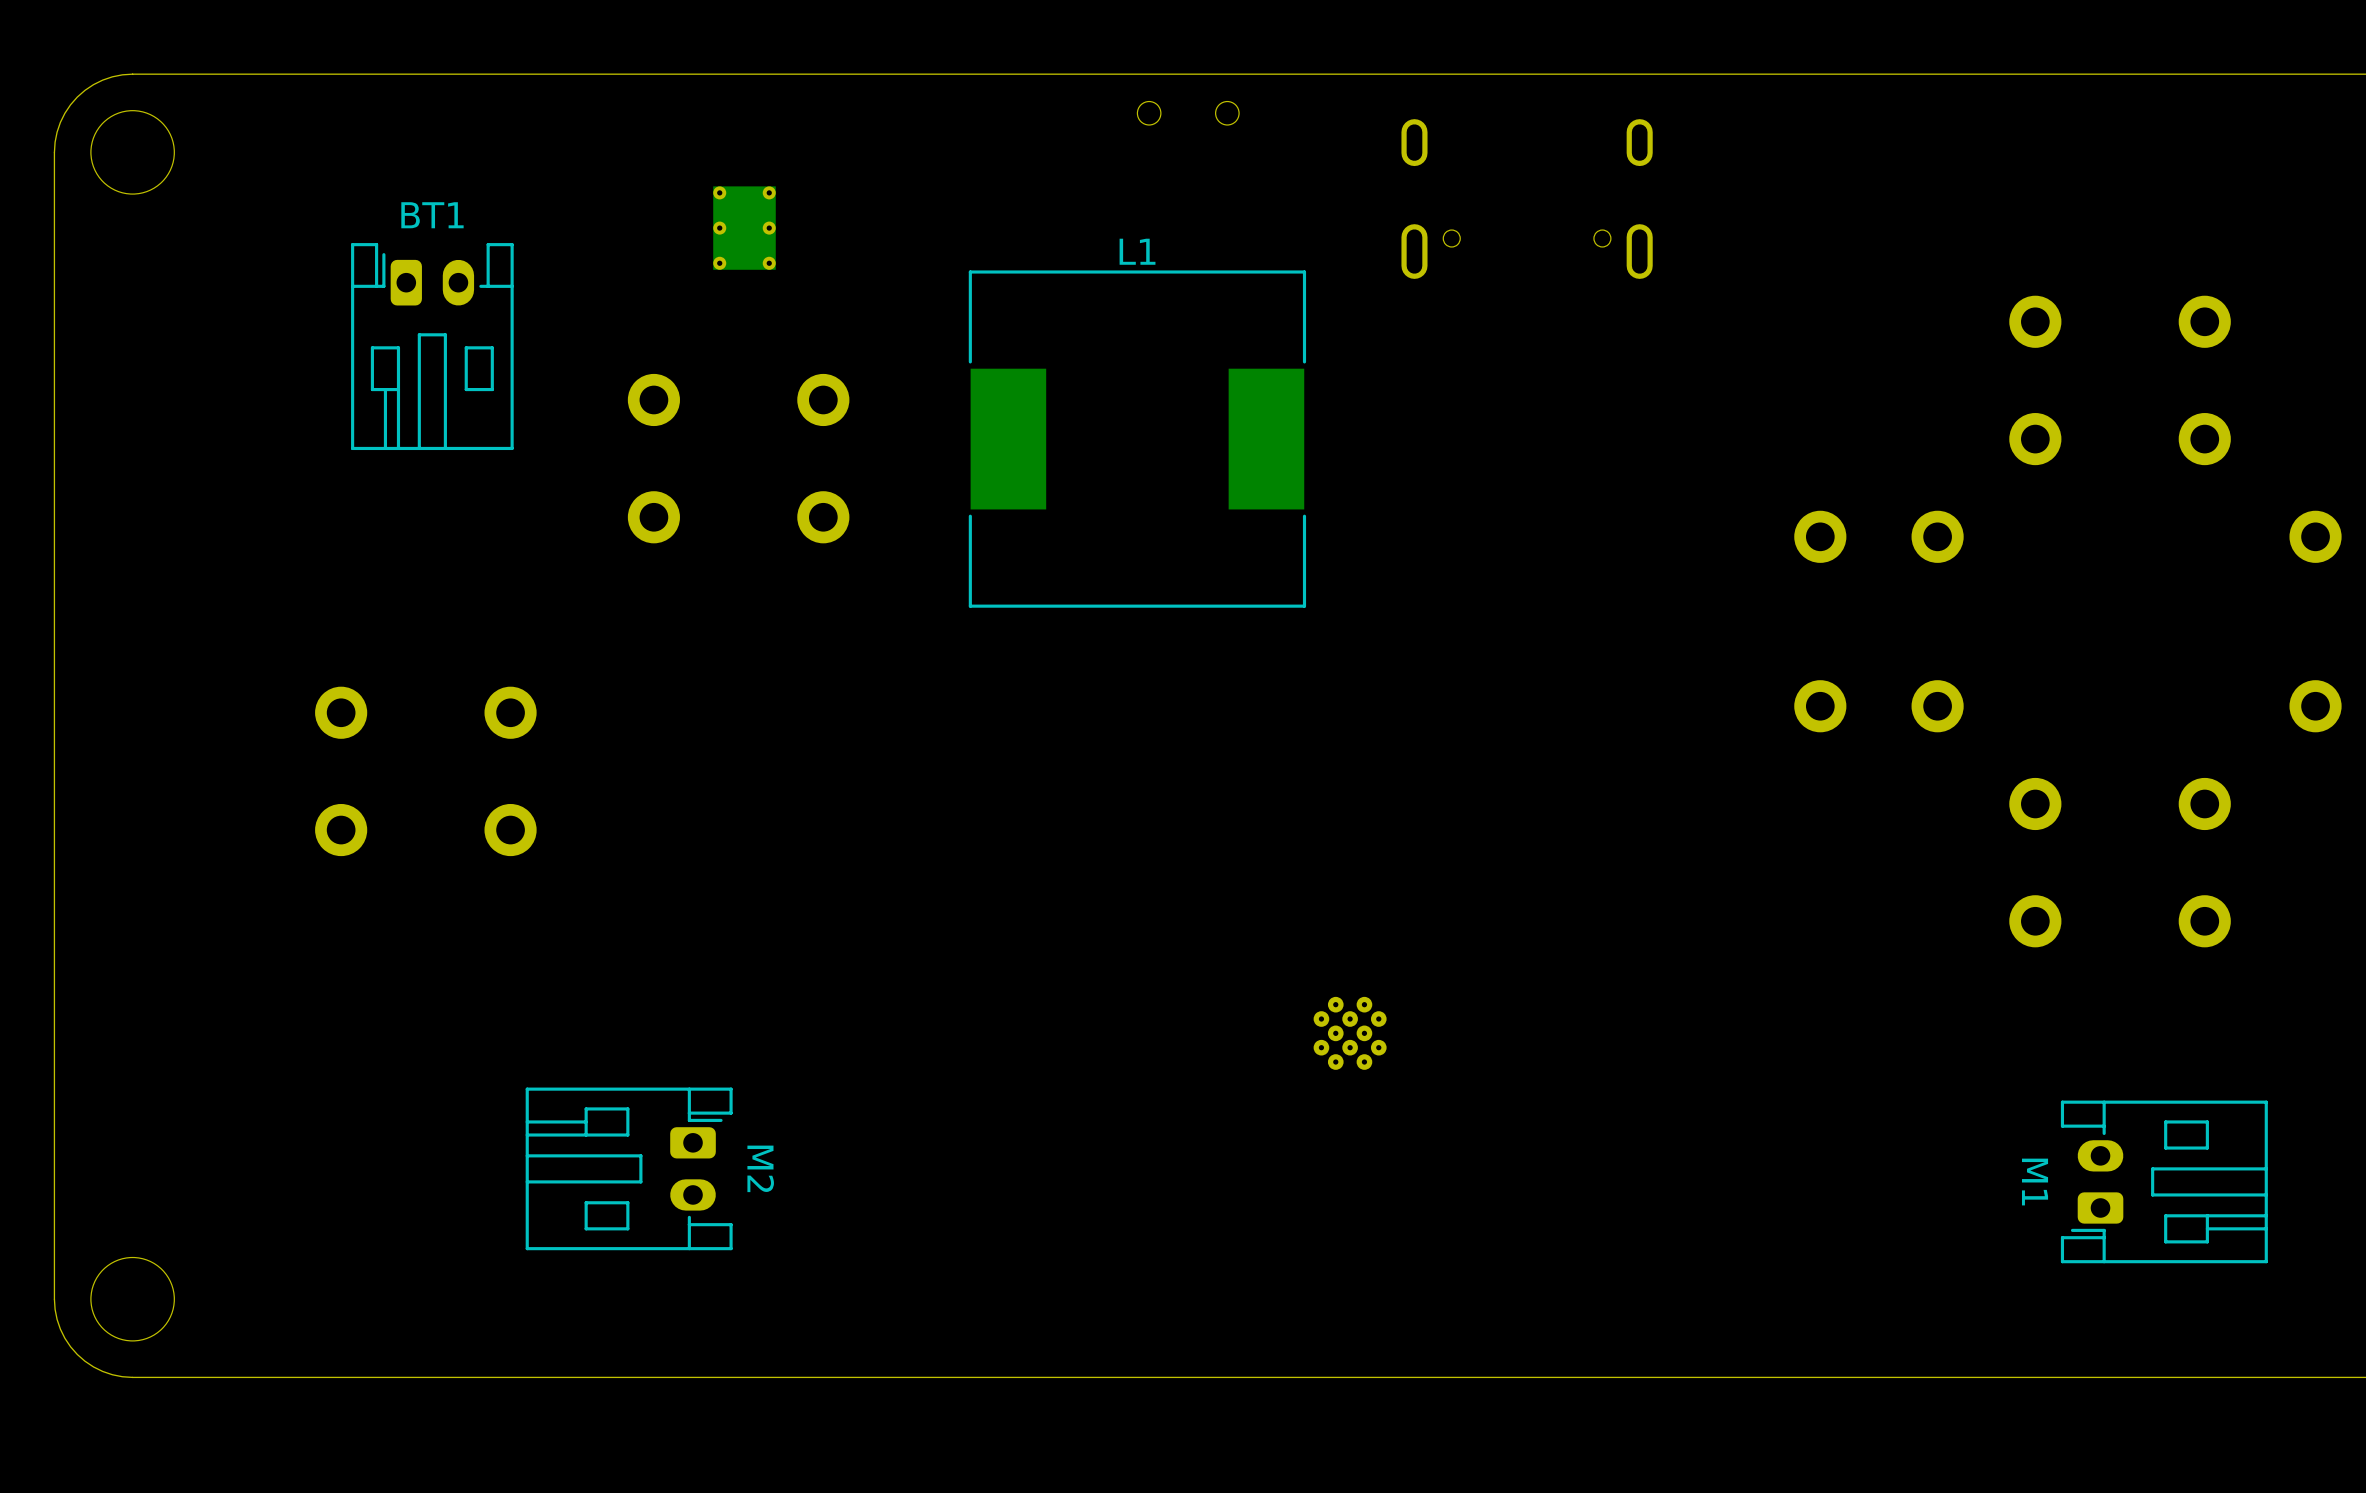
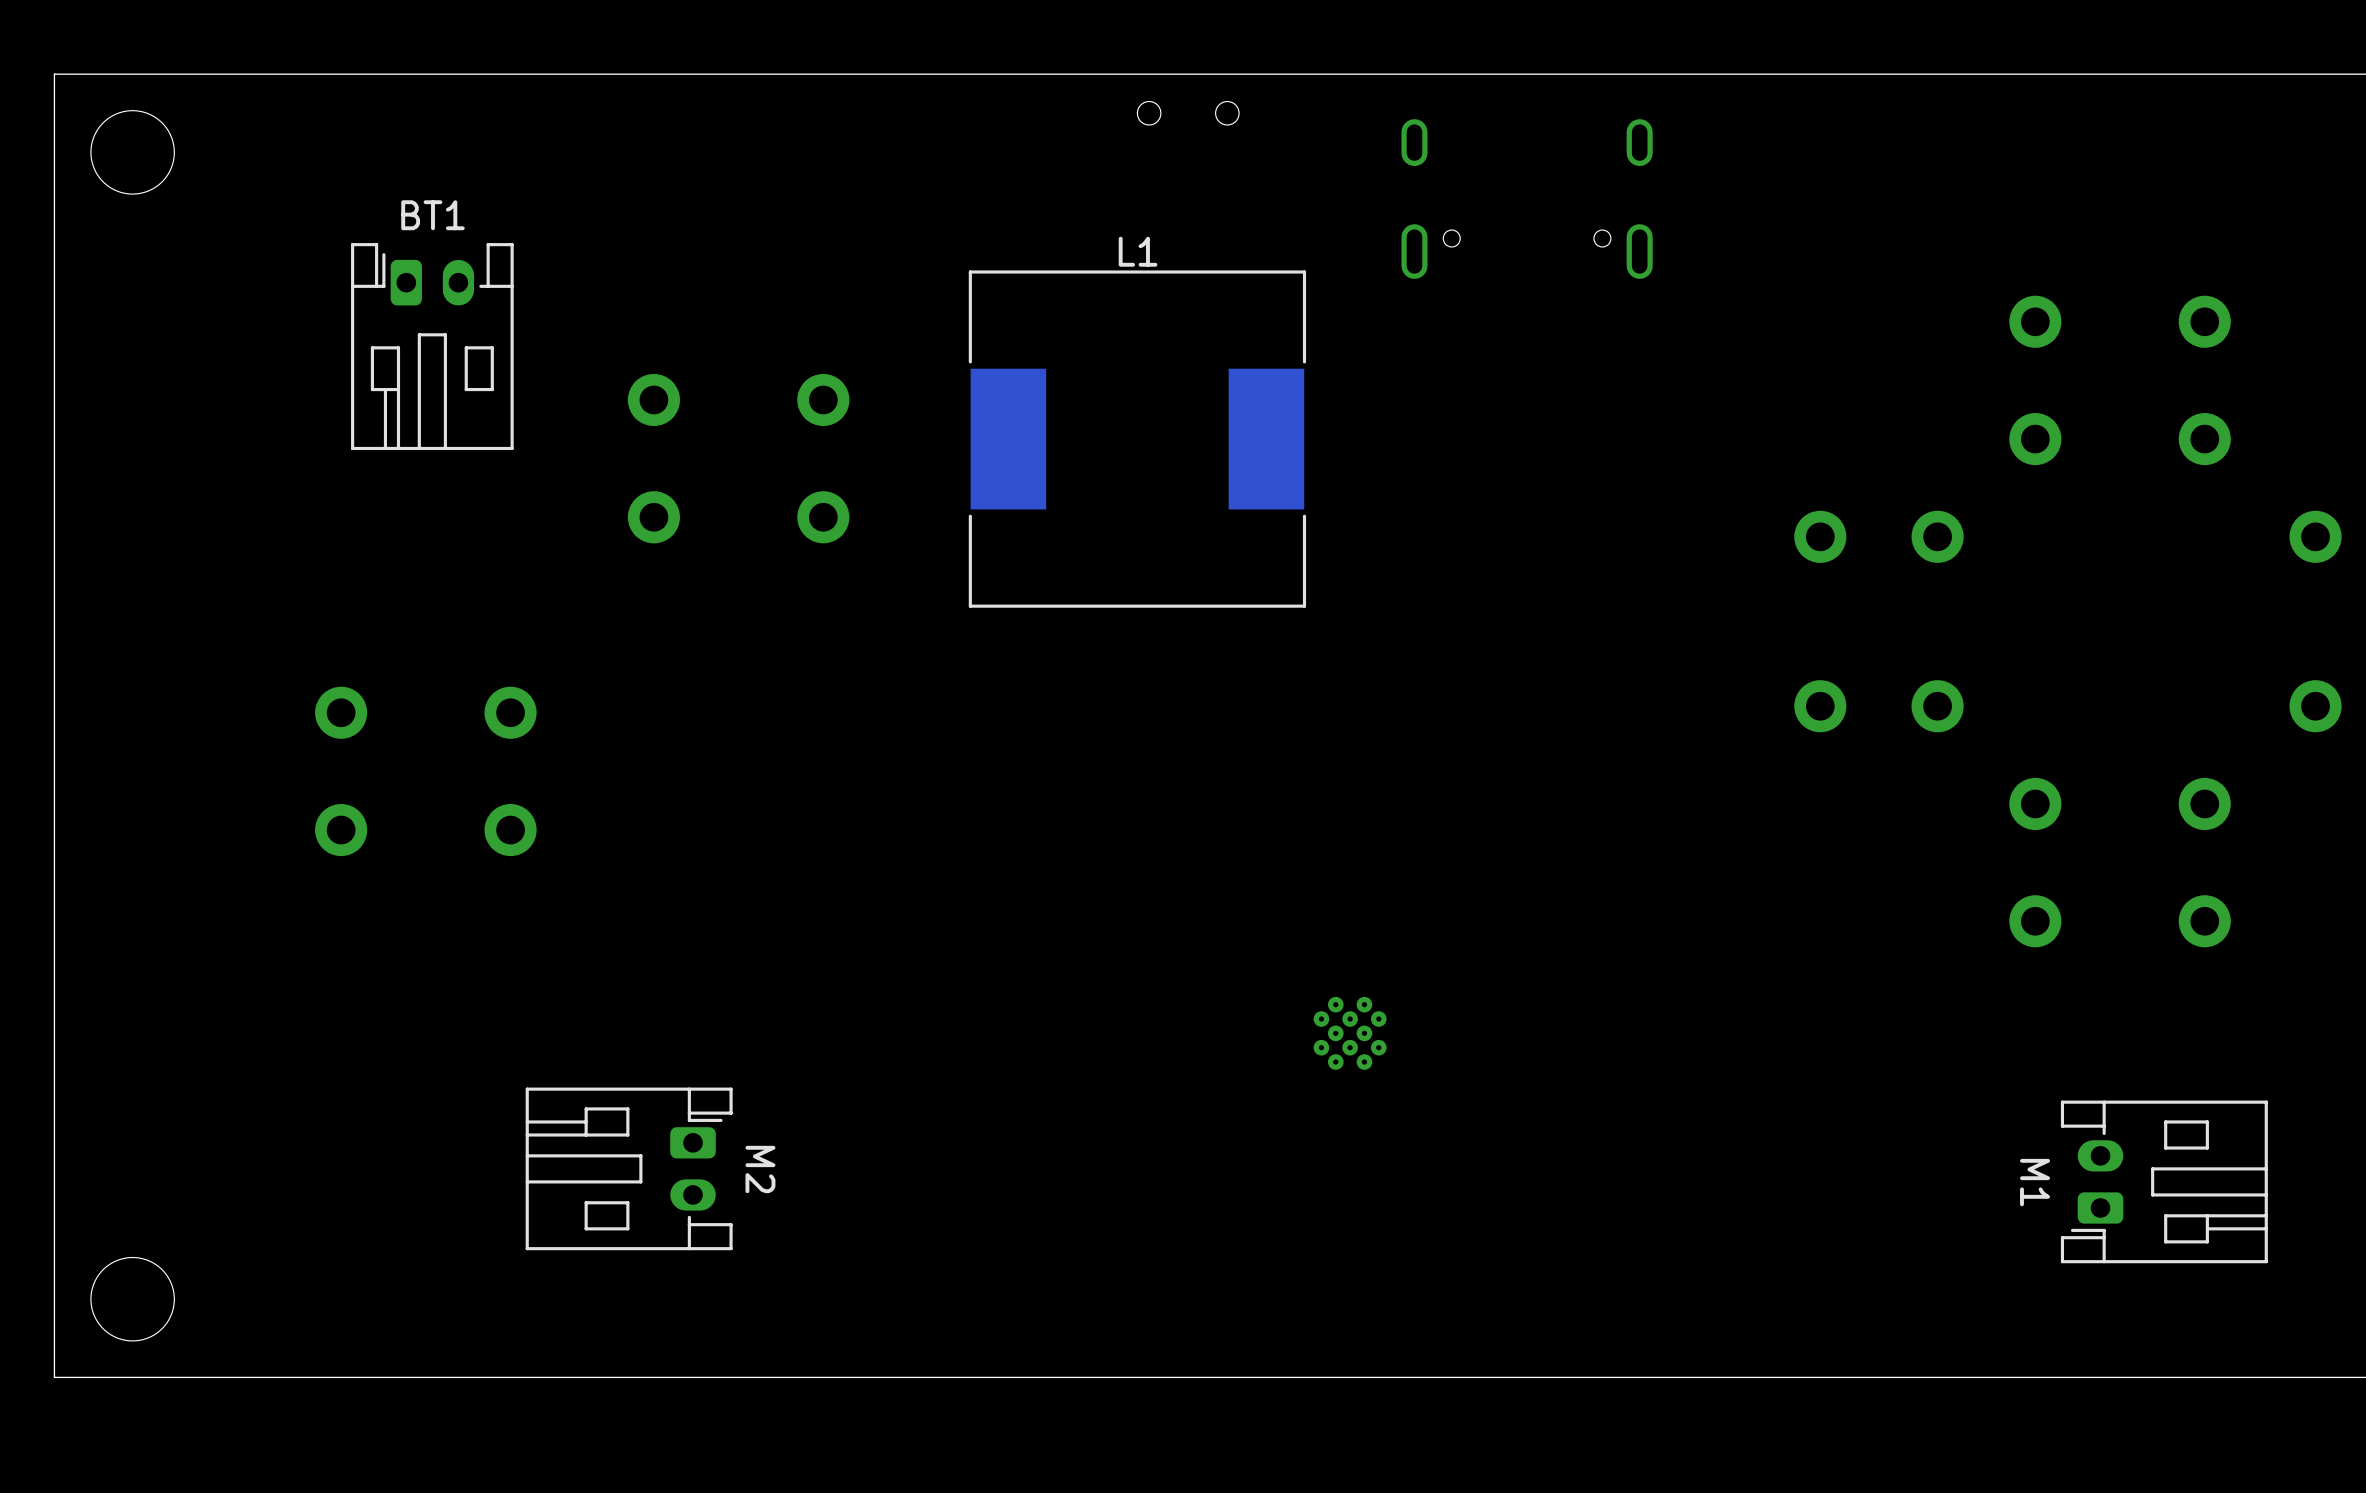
board edge: (132, 74) (102, 80) (77, 97) (60, 122) (54, 152) -> (132, 74) (54, 74) (54, 152)
part: (744, 228) -> none
board edge: (54, 1299) (60, 1329) (77, 1354) (102, 1371) (132, 1377) -> (54, 1299) (54, 1377) (132, 1377)

